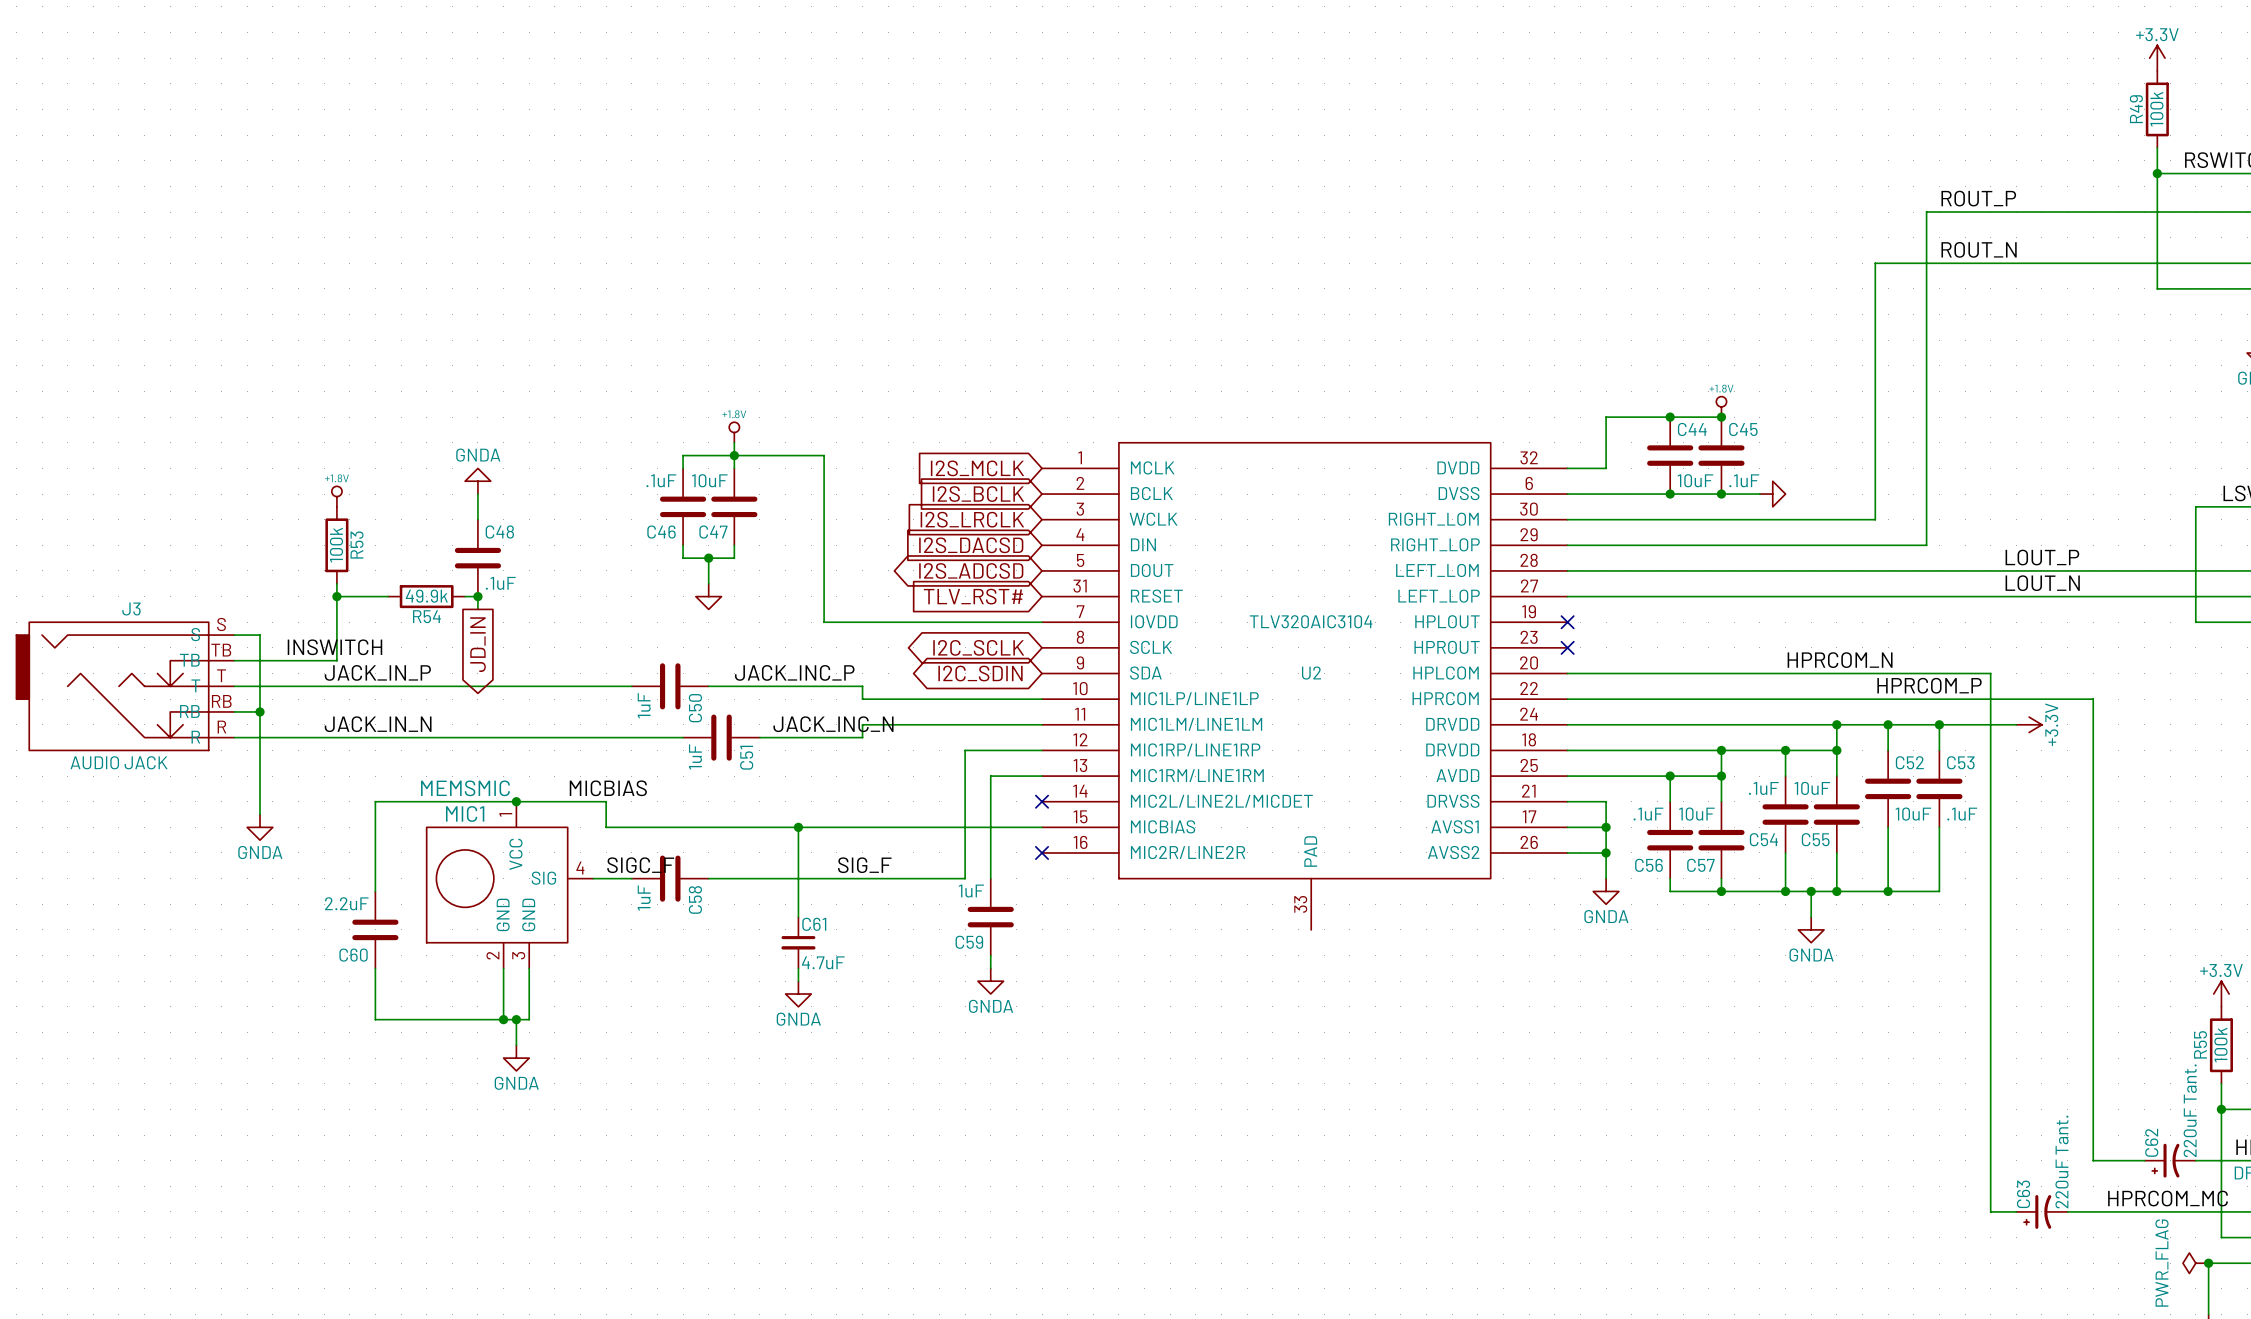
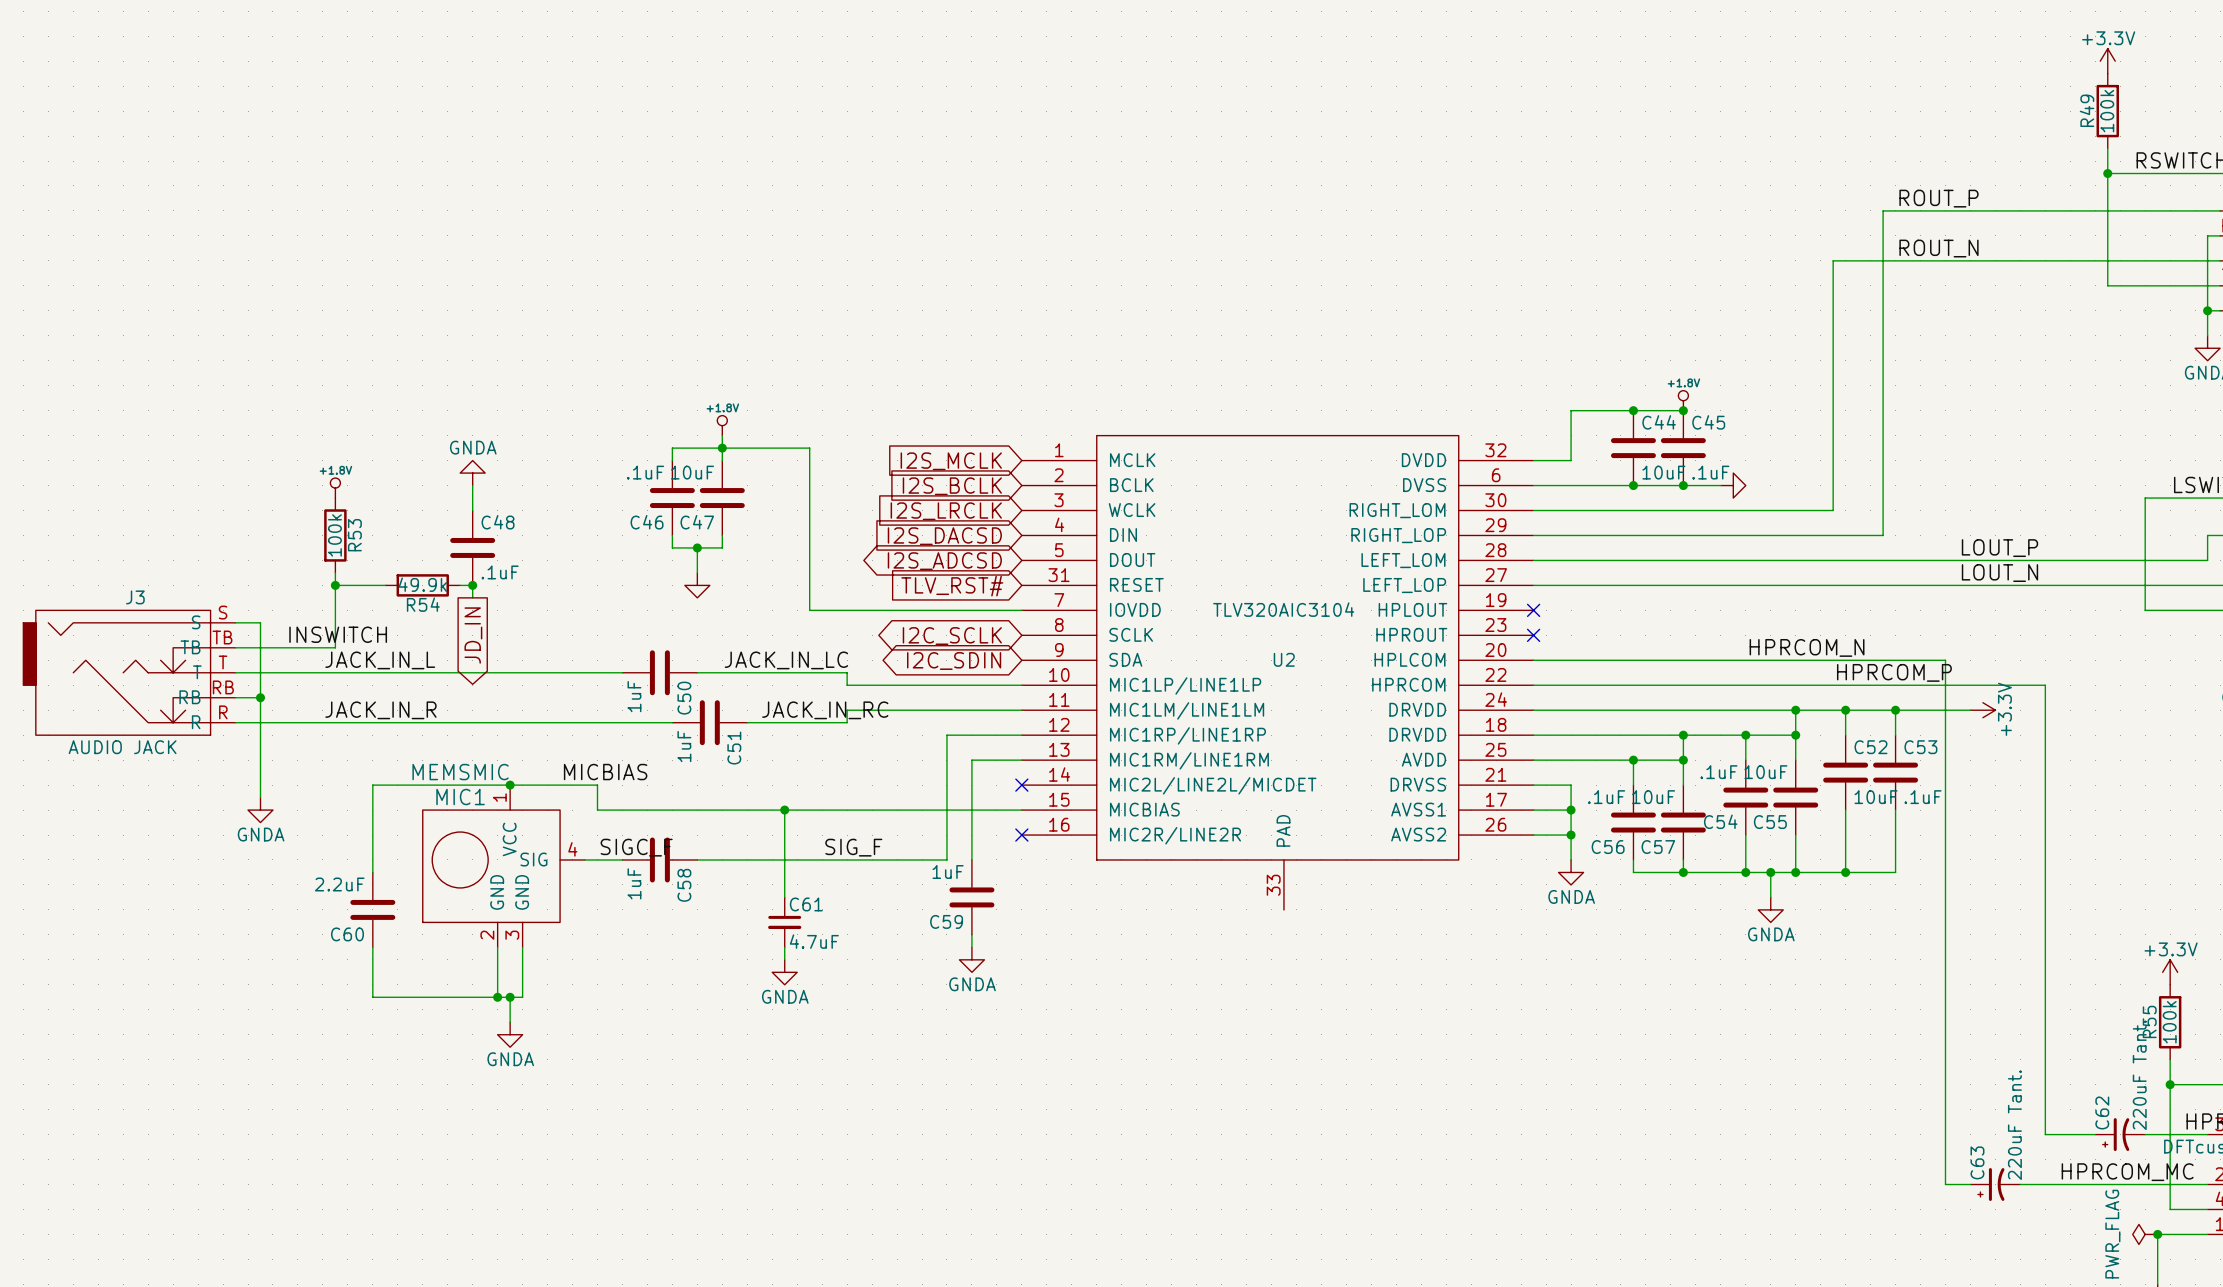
label: JACK_IN_P (377, 672) -> JACK_IN_L (380, 660)
label: JACK_INC_P (794, 672) -> JACK_IN_LC (786, 660)
label: JACK_IN_N (378, 724) -> JACK_IN_R (380, 710)
label: JACK_INC_N (833, 724) -> JACK_IN_RC (825, 710)

